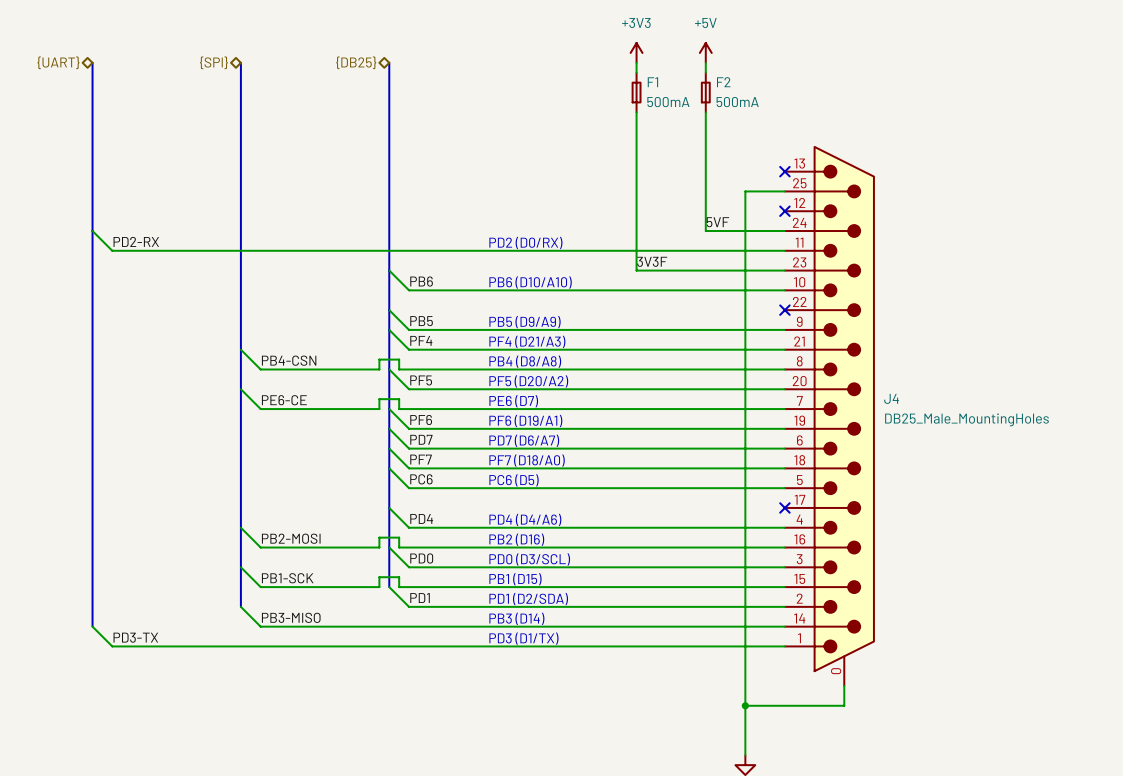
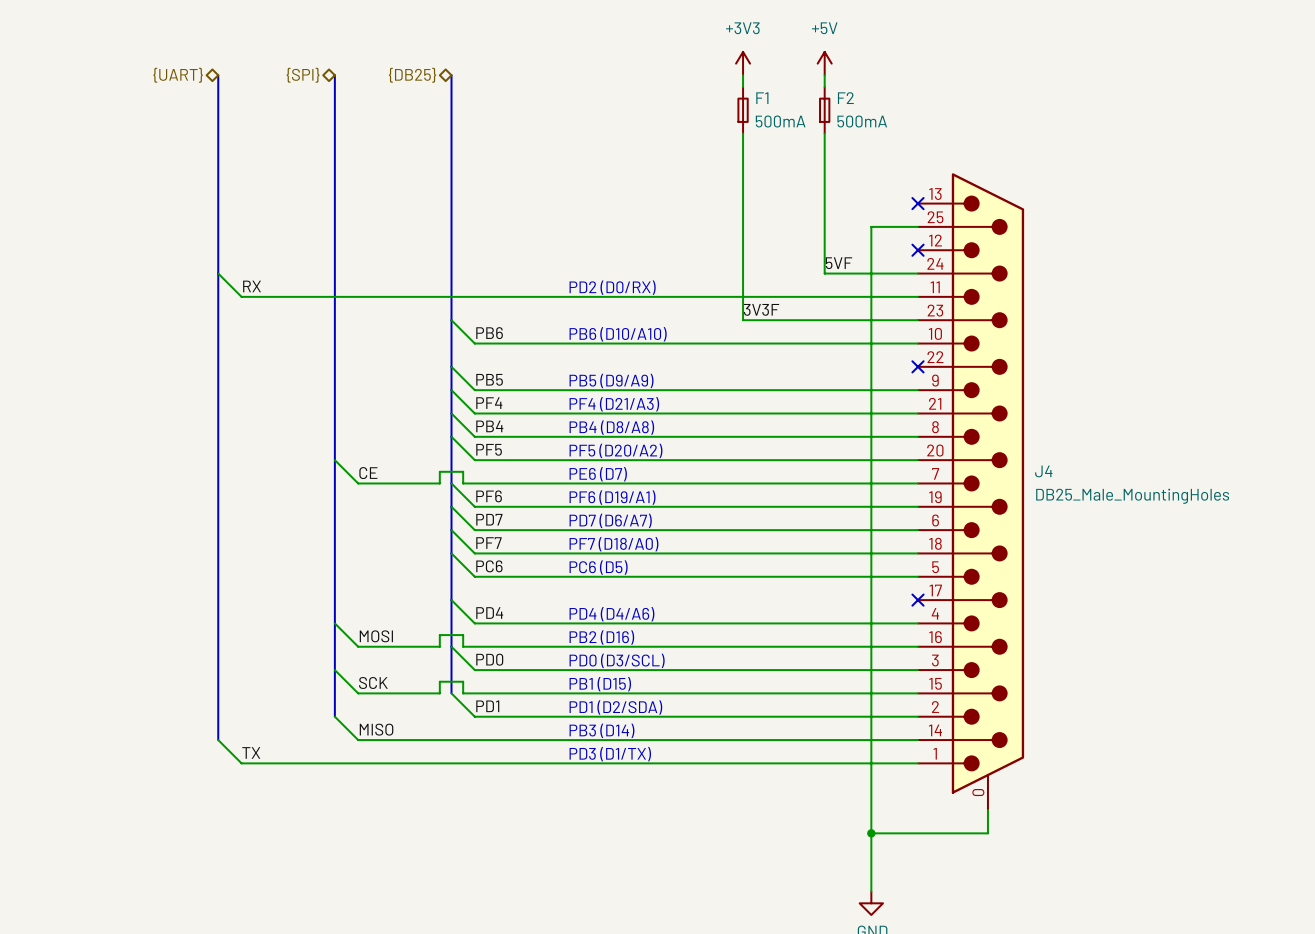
hierarchical label position: {UART} (58, 62) -> {UART} (178, 75)
bus: (92, 62) (92, 626) -> (218, 75) (218, 740)
hierarchical label position: {SPI} (213, 62) -> {SPI} (303, 75)
bus: (240, 62) (240, 606) -> (334, 75) (334, 716)
wire: (92, 231) (112, 250) (211, 250) -> (218, 273) (241, 296)
label: PD2-RX (136, 241) -> none
label: none -> RX (252, 286)
wire: (240, 349) (260, 369) (379, 369) (379, 359) (399, 359) (399, 369) (409, 369) -> (451, 413) (474, 436)
label: PB4-CSN (289, 360) -> none
label: none -> PB4 (489, 426)
wire: (240, 389) (260, 409) (310, 409) -> (334, 460) (358, 483)
label: PE6-CE (284, 400) -> none
label: none -> CE (368, 473)
wire: (240, 527) (260, 547) (310, 547) -> (334, 623) (358, 646)
label: PB2-MOSI (291, 538) -> MOSI (376, 636)
wire: (240, 567) (260, 587) (310, 587) -> (334, 670) (358, 693)
label: PB1-SCK (287, 578) -> none
label: none -> SCK (373, 683)
wire: (240, 606) (260, 626) (310, 626) -> (334, 716) (358, 740)
label: PB3-MISO (291, 617) -> MISO (376, 729)
wire: (92, 626) (112, 646) (211, 646) -> (218, 740) (241, 763)
label: PD3-TX (135, 637) -> none
label: none -> TX (251, 752)

